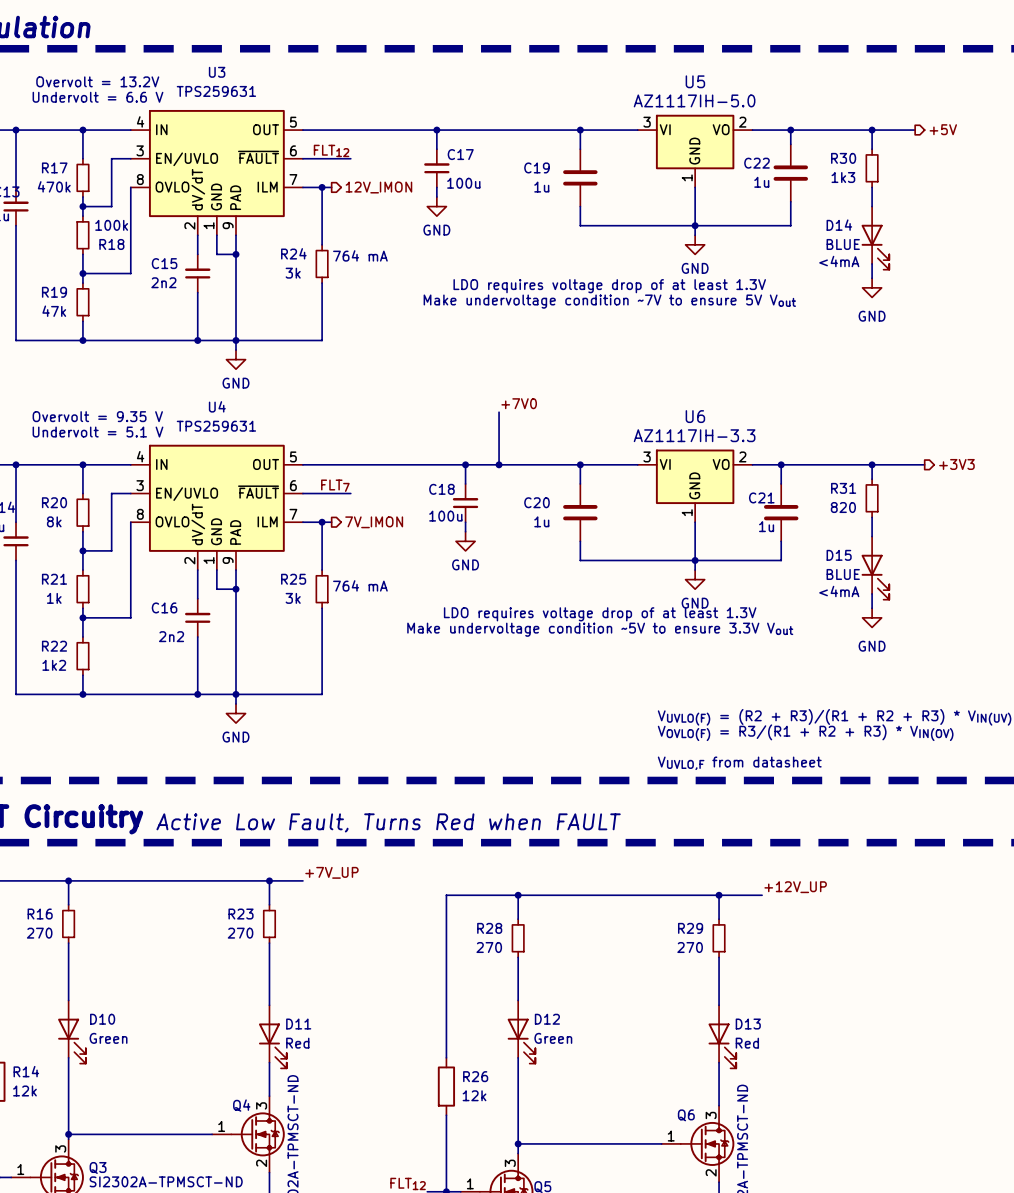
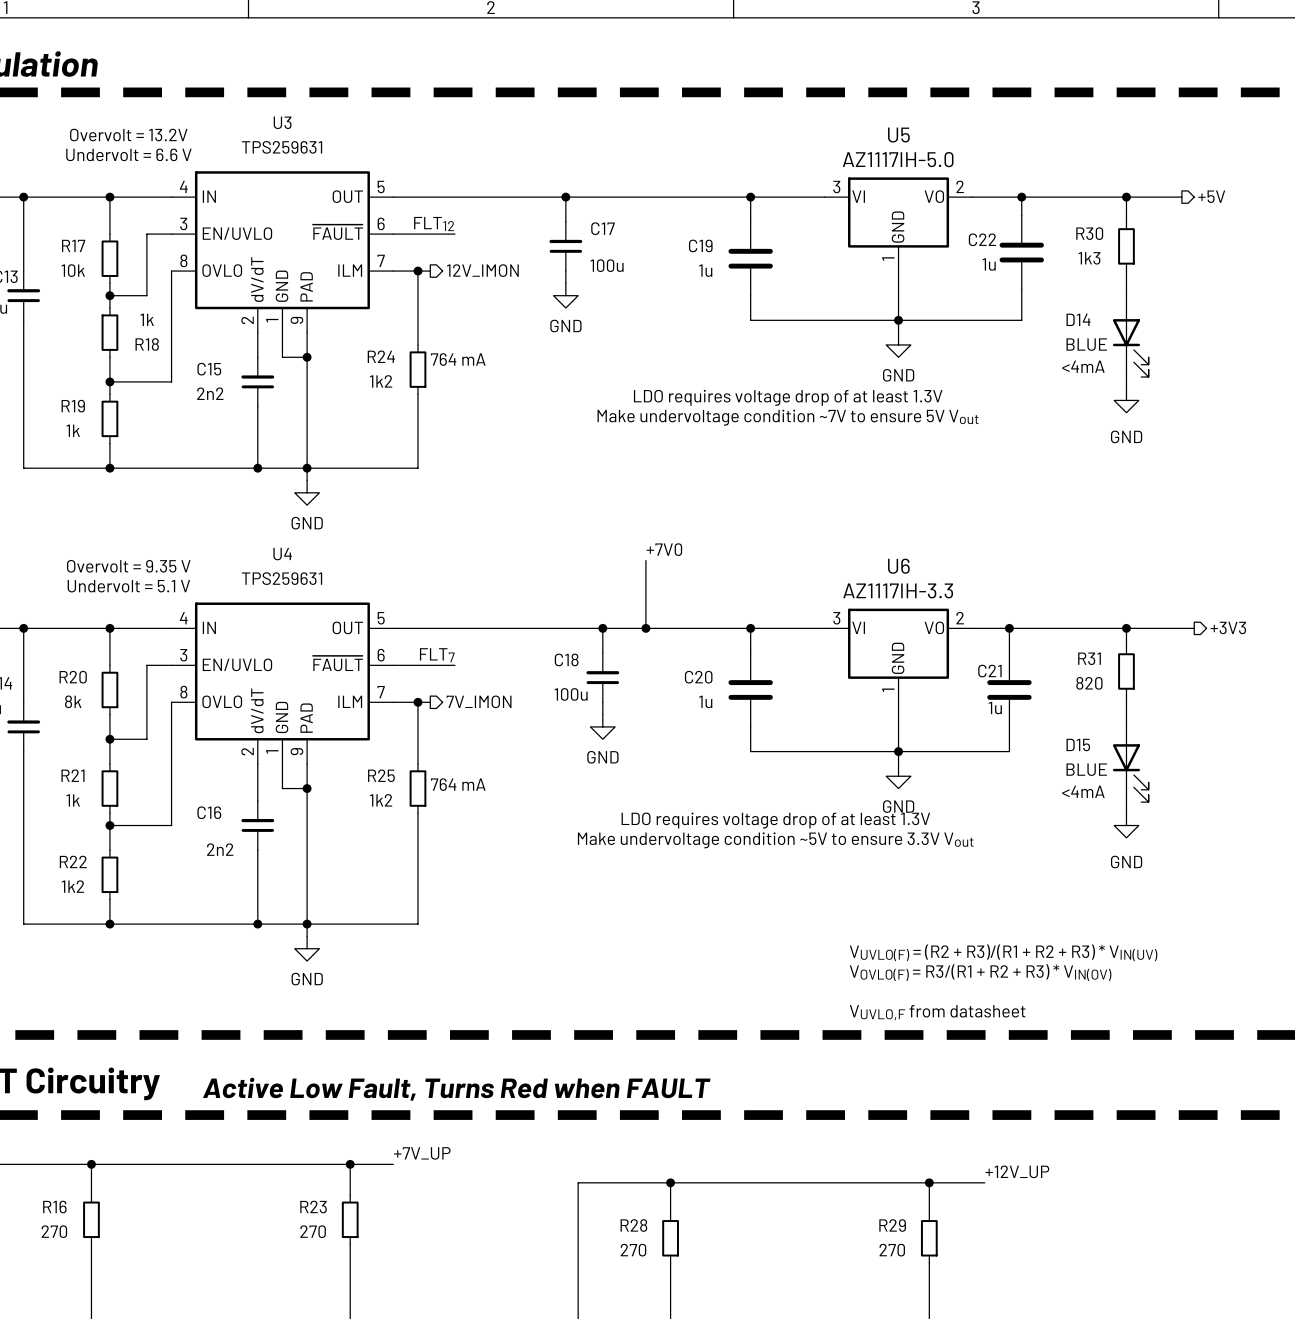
R17 value: 470k (54, 186) -> 10k (73, 270)
R18 value: 100k (111, 225) -> 1k (147, 319)
R24 value: 3k (293, 273) -> 1k2 (381, 381)
R19 value: 47k (54, 311) -> 1k (73, 430)
R25 value: 3k (293, 598) -> 1k2 (381, 800)

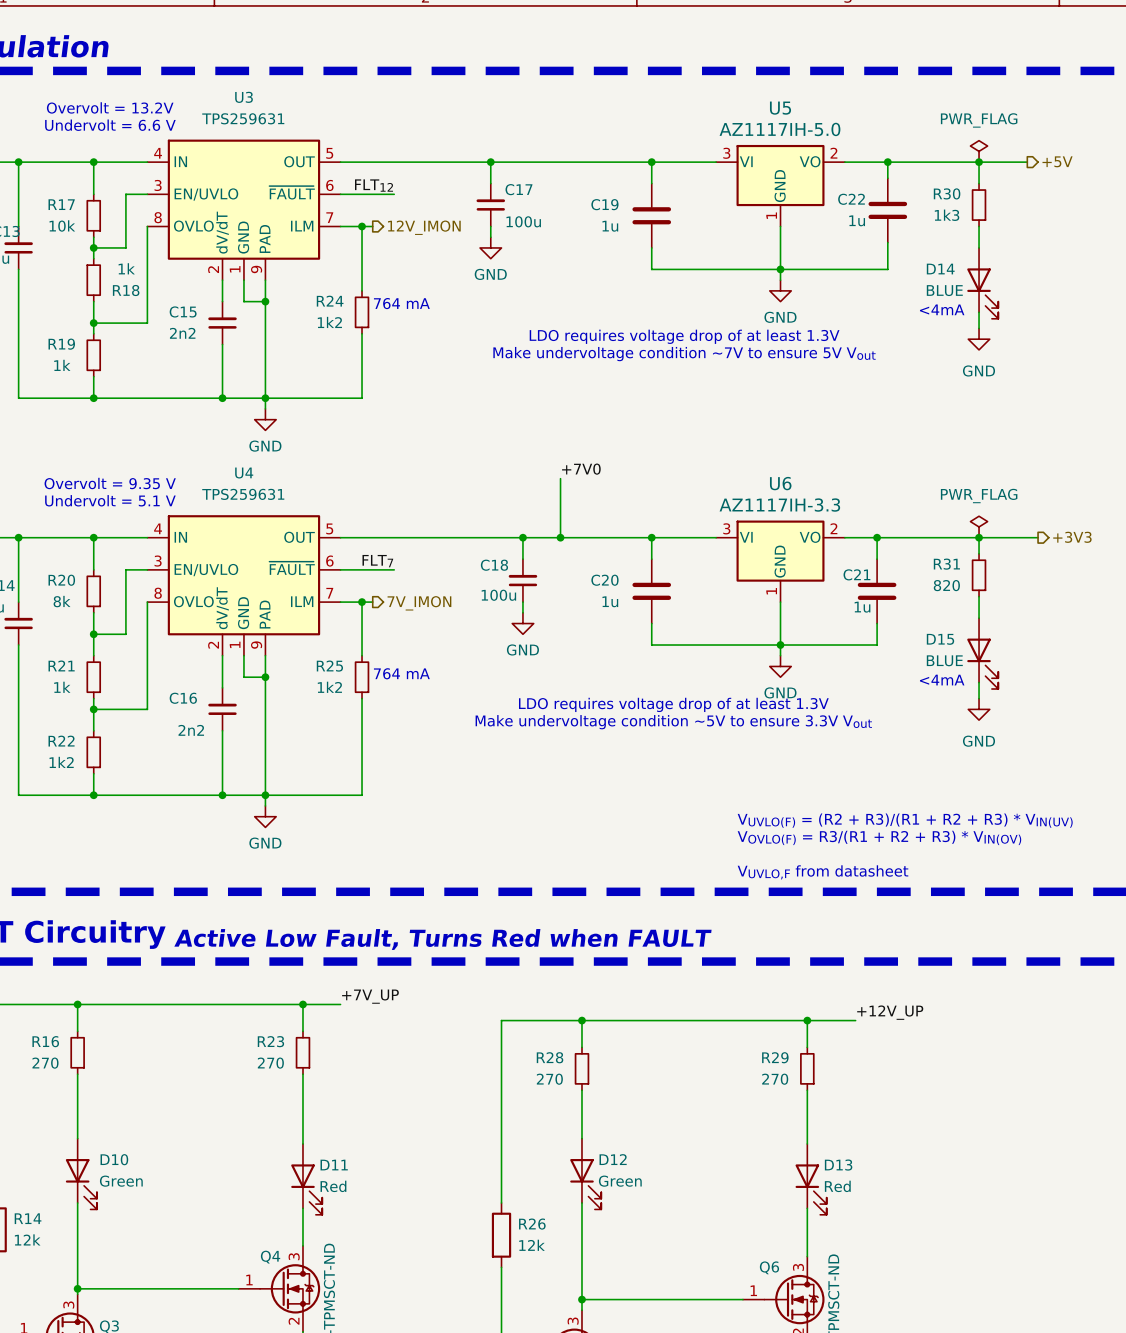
power symbol: none -> PWR_FLAG (979, 151)
power symbol: none -> PWR_FLAG (979, 526)

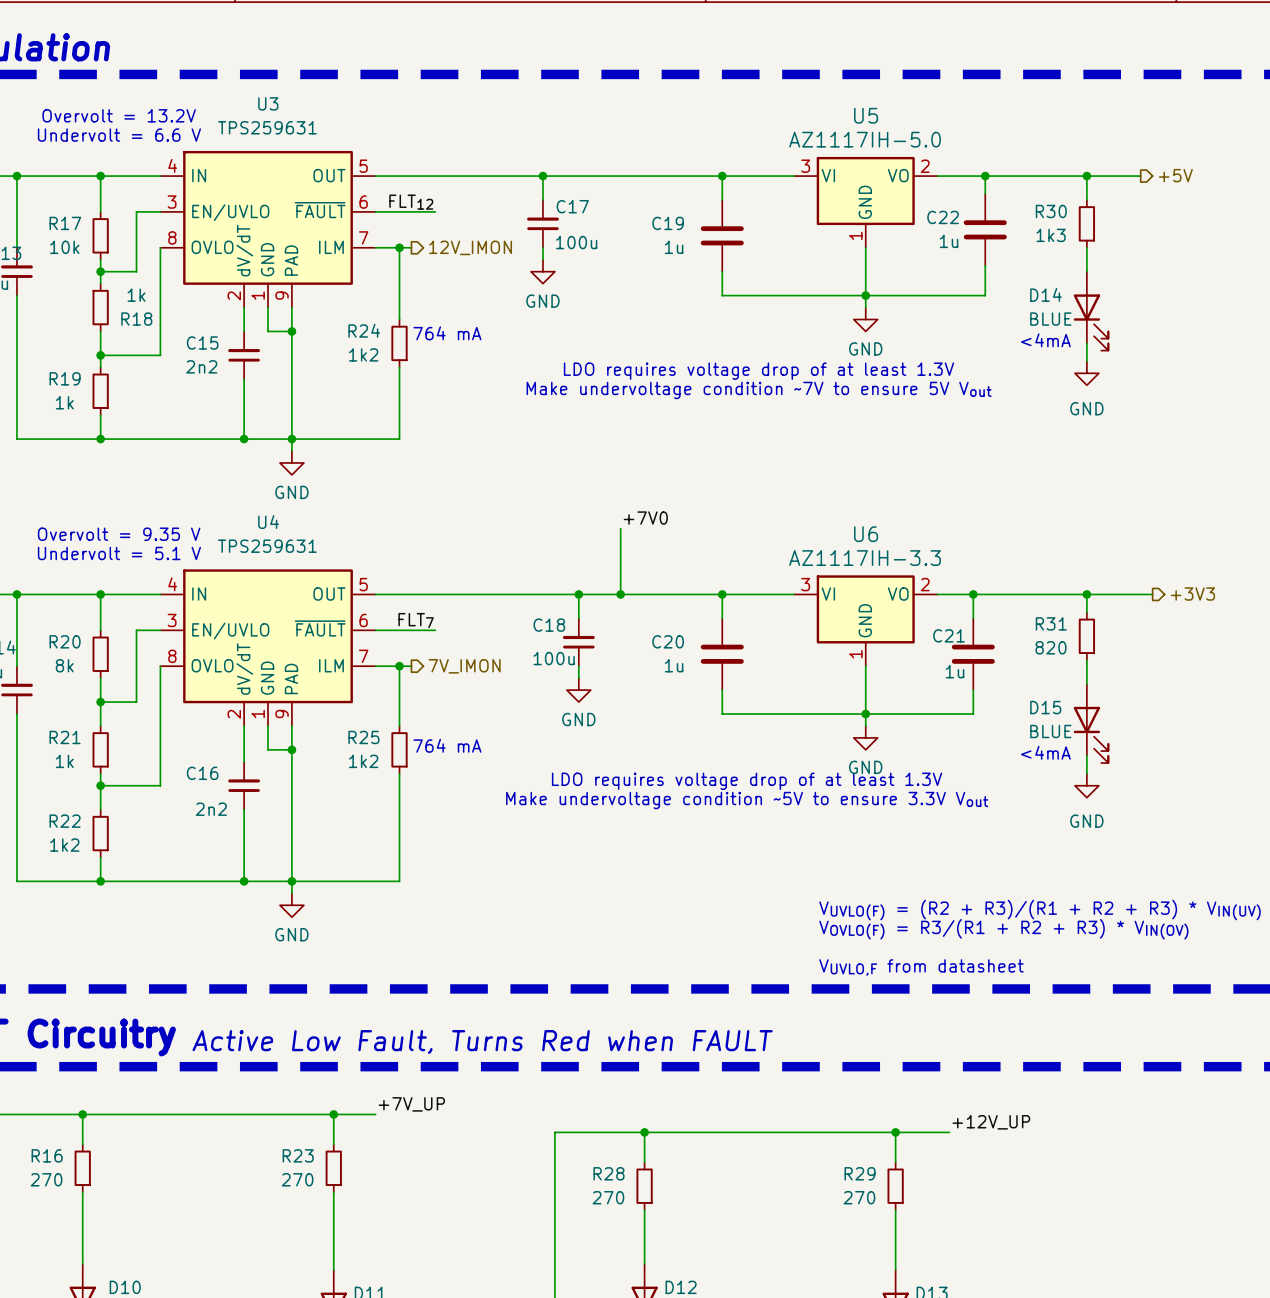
power symbol: PWR_FLAG (979, 151) -> none
power symbol: PWR_FLAG (979, 526) -> none

